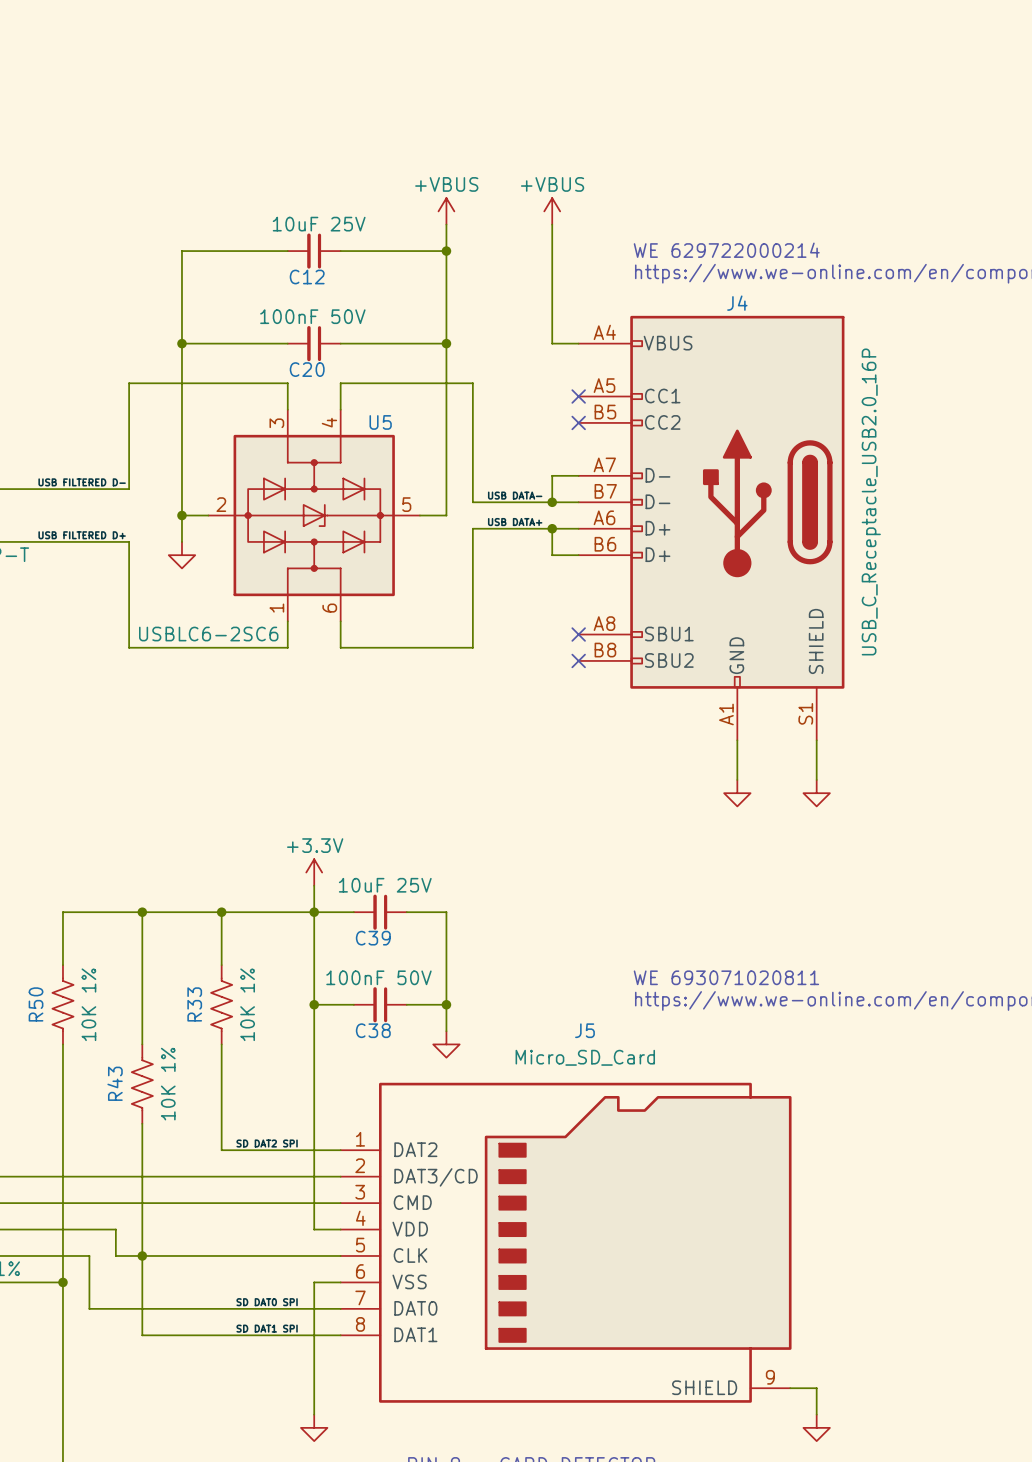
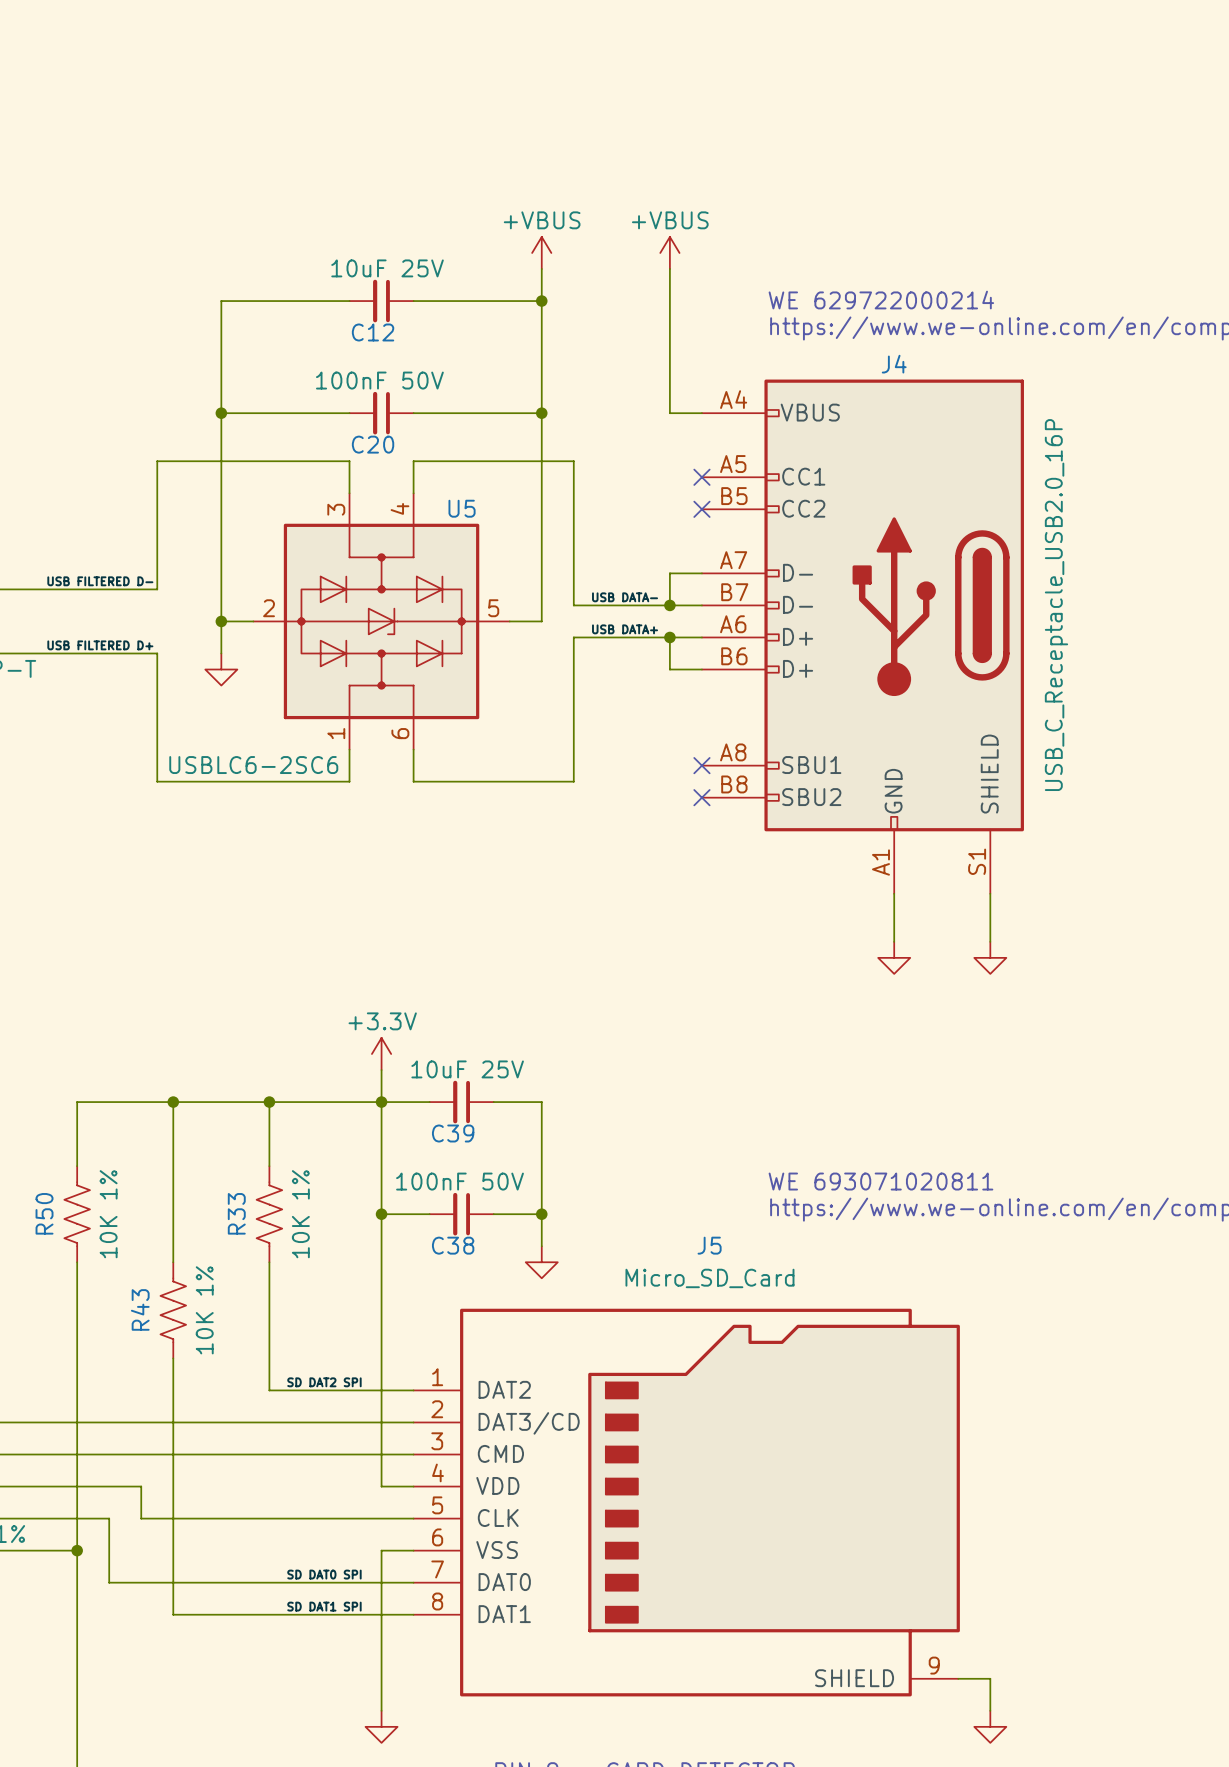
junction: (142, 1255) -> none

